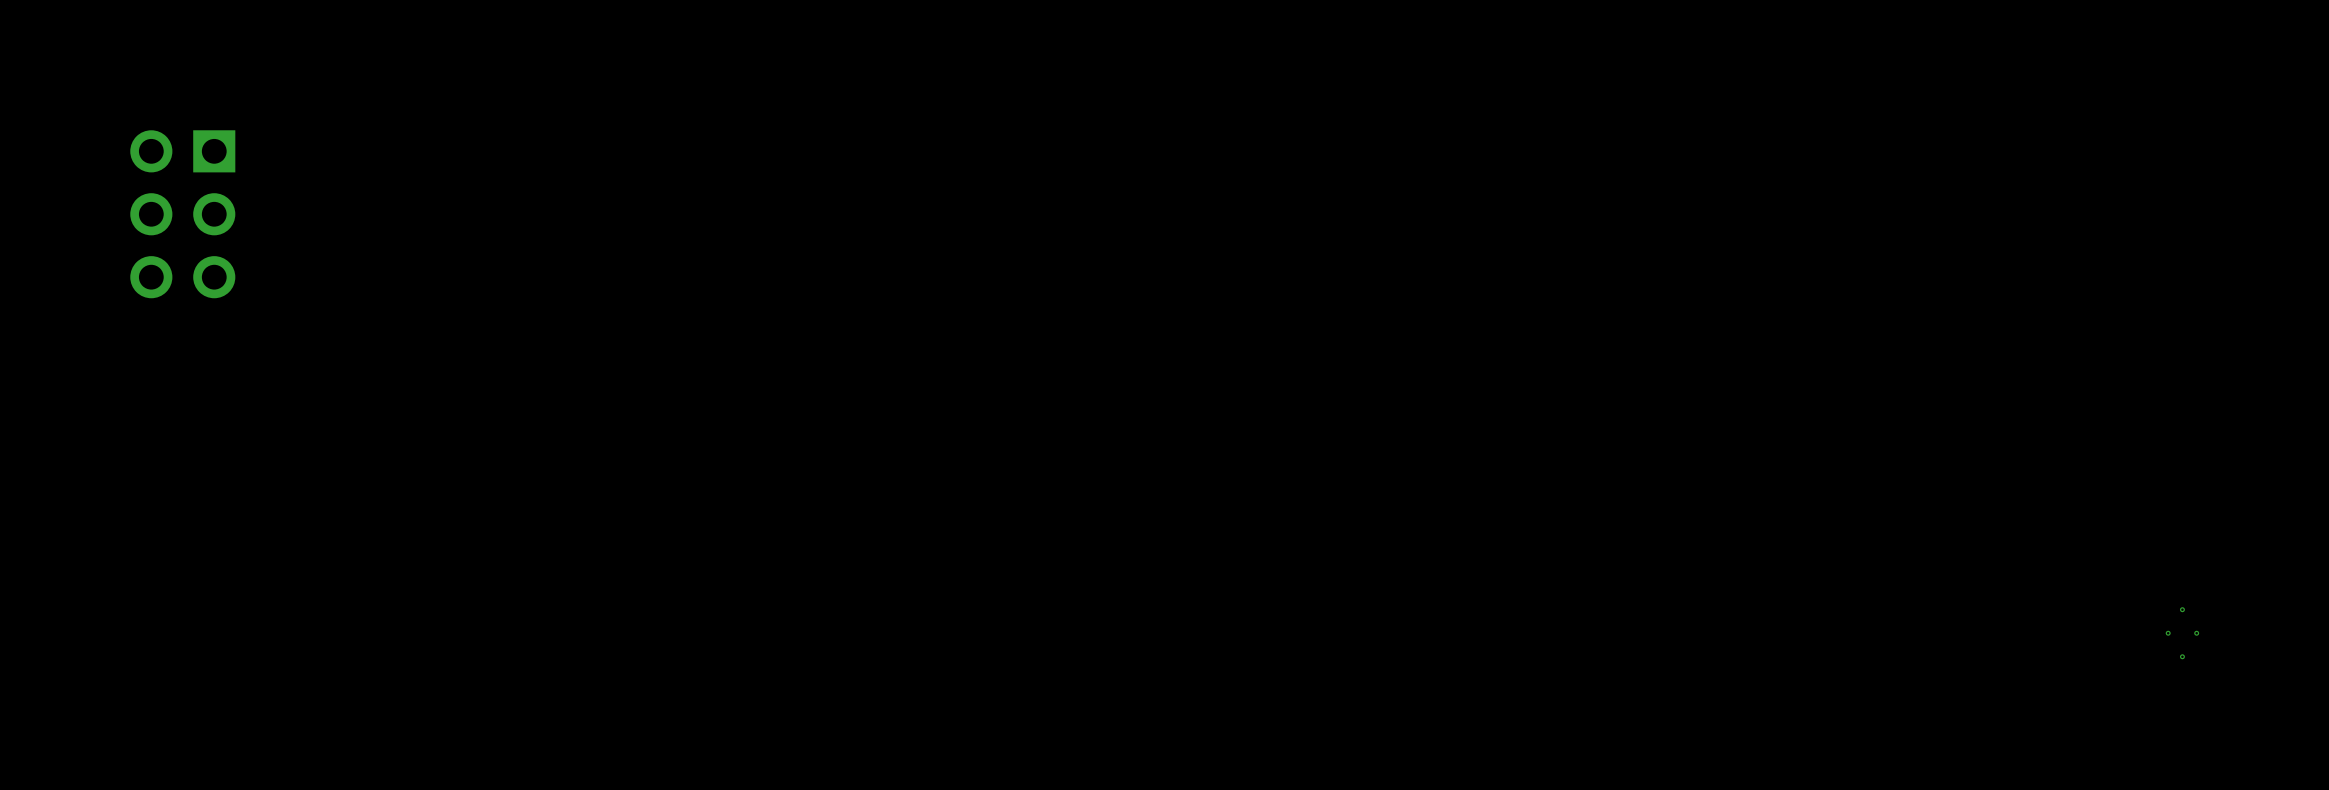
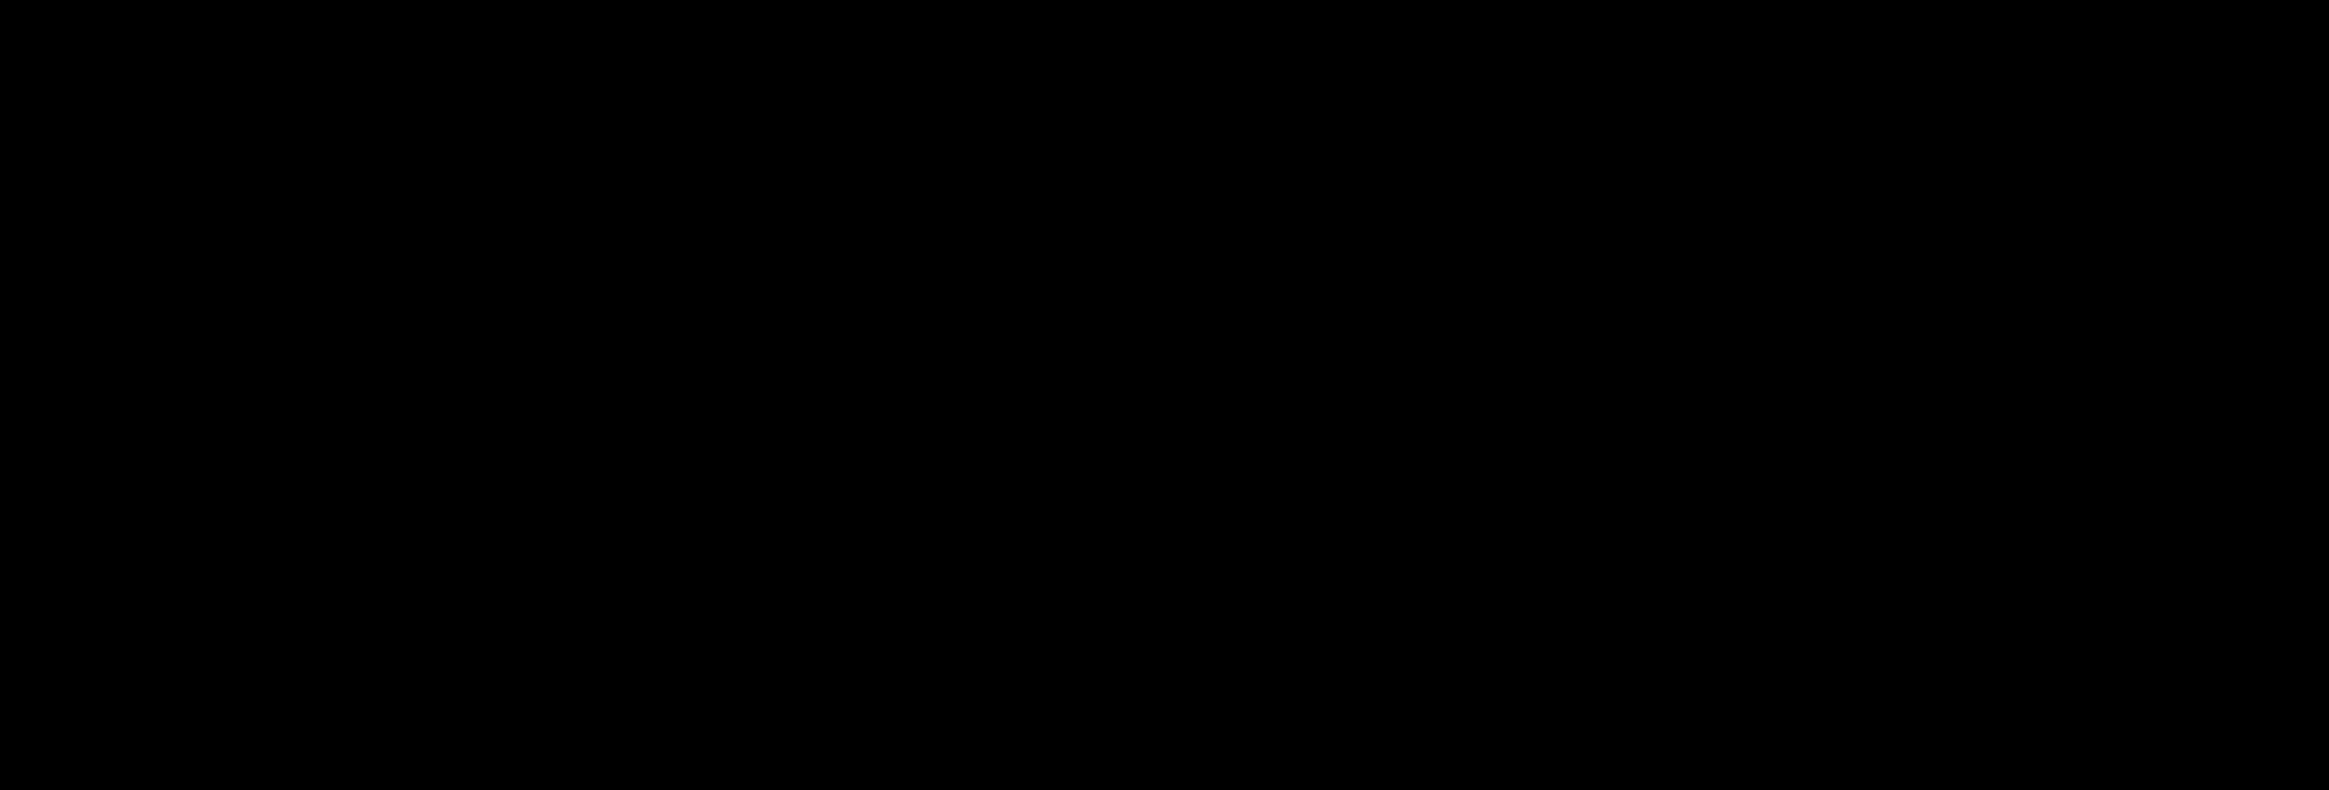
part: (182, 214) -> none
part: (2182, 633) -> none

